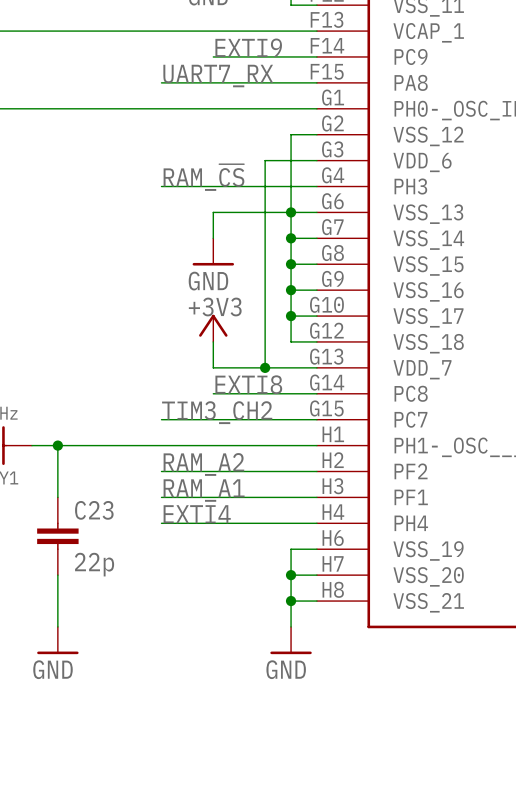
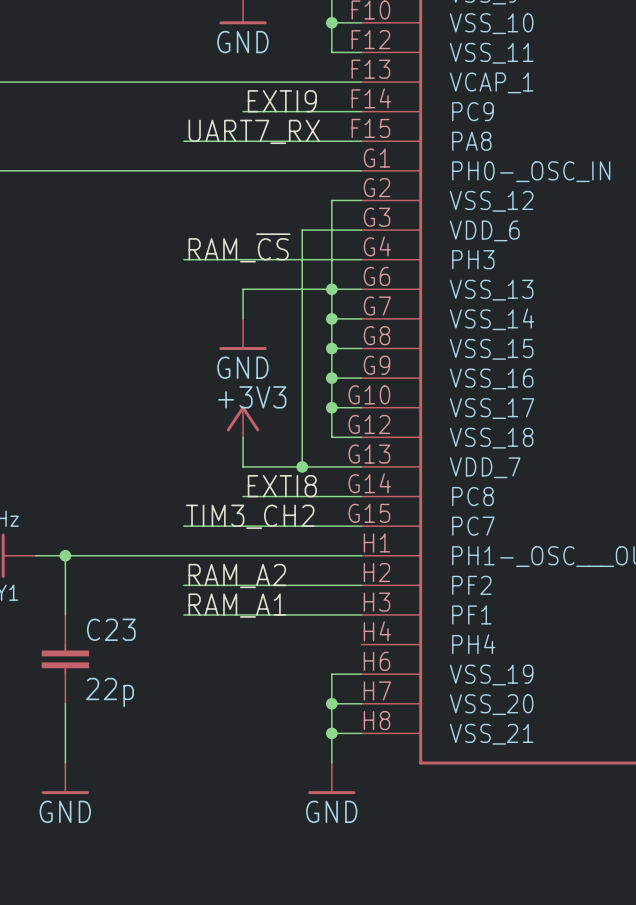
label: EXTI4 (197, 514) -> none
wire: (161, 523) (316, 523) -> none

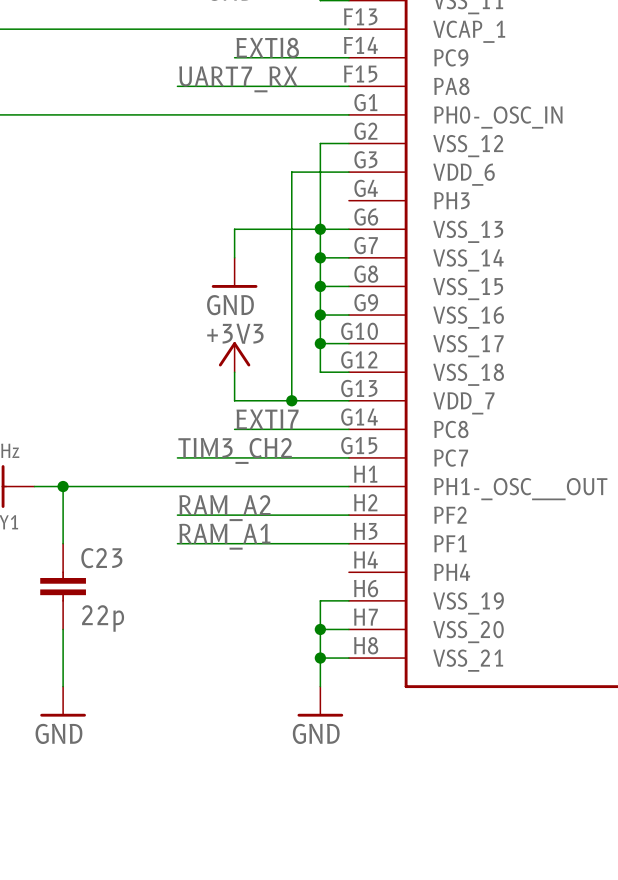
label: EXTI9 (282, 101) -> EXTI8 (267, 47)
label: RAM_~{CS} (239, 247) -> none
wire: (183, 259) (361, 259) -> none
label: EXTI8 (282, 486) -> EXTI7 (267, 419)

